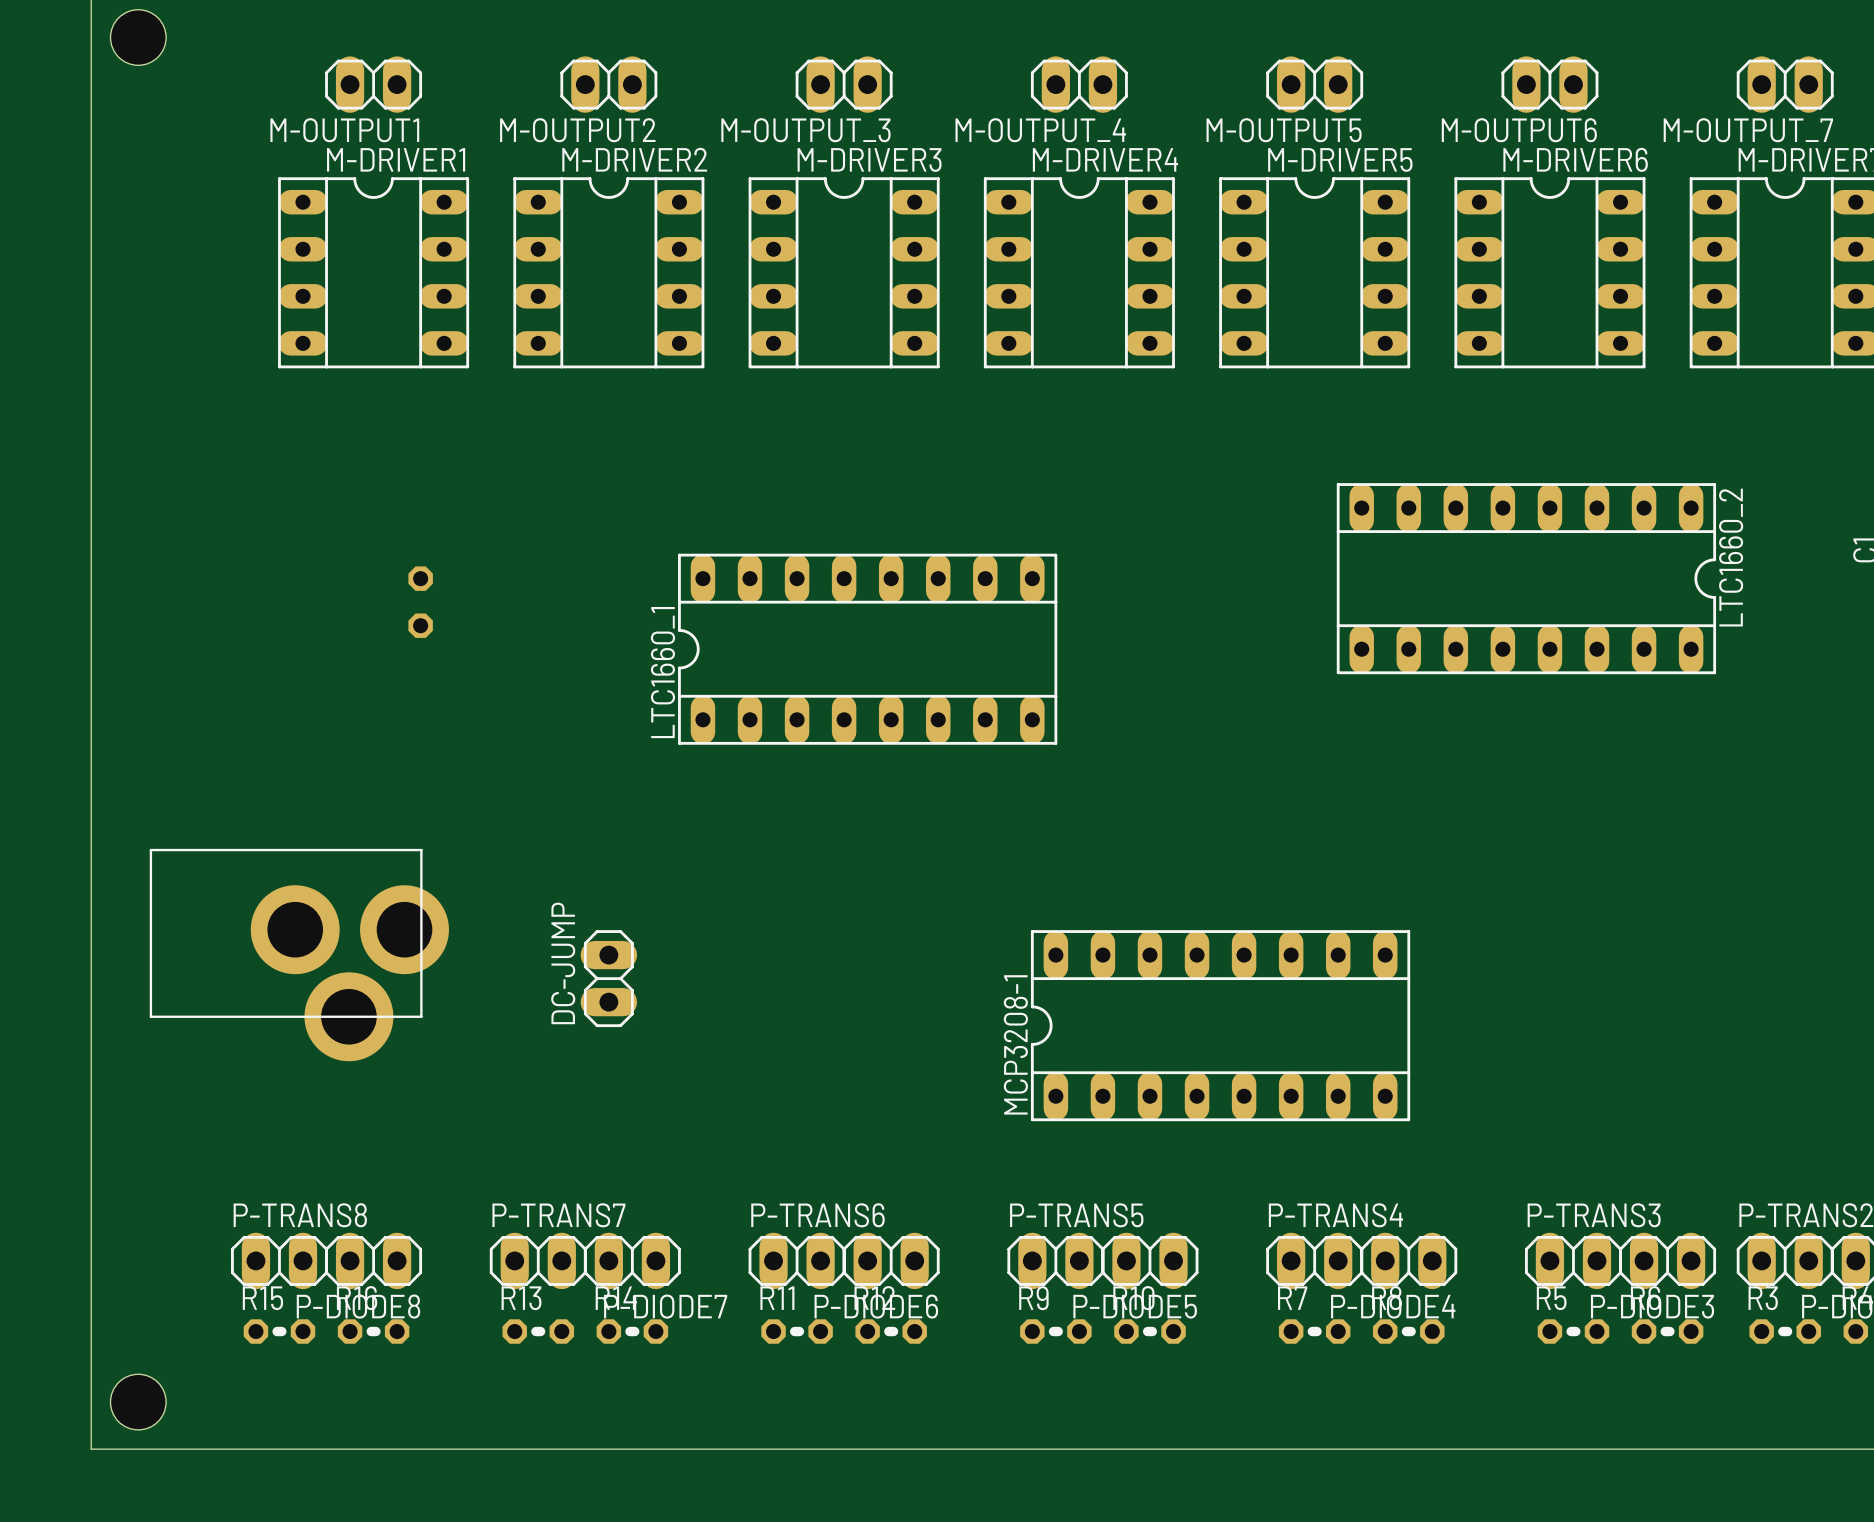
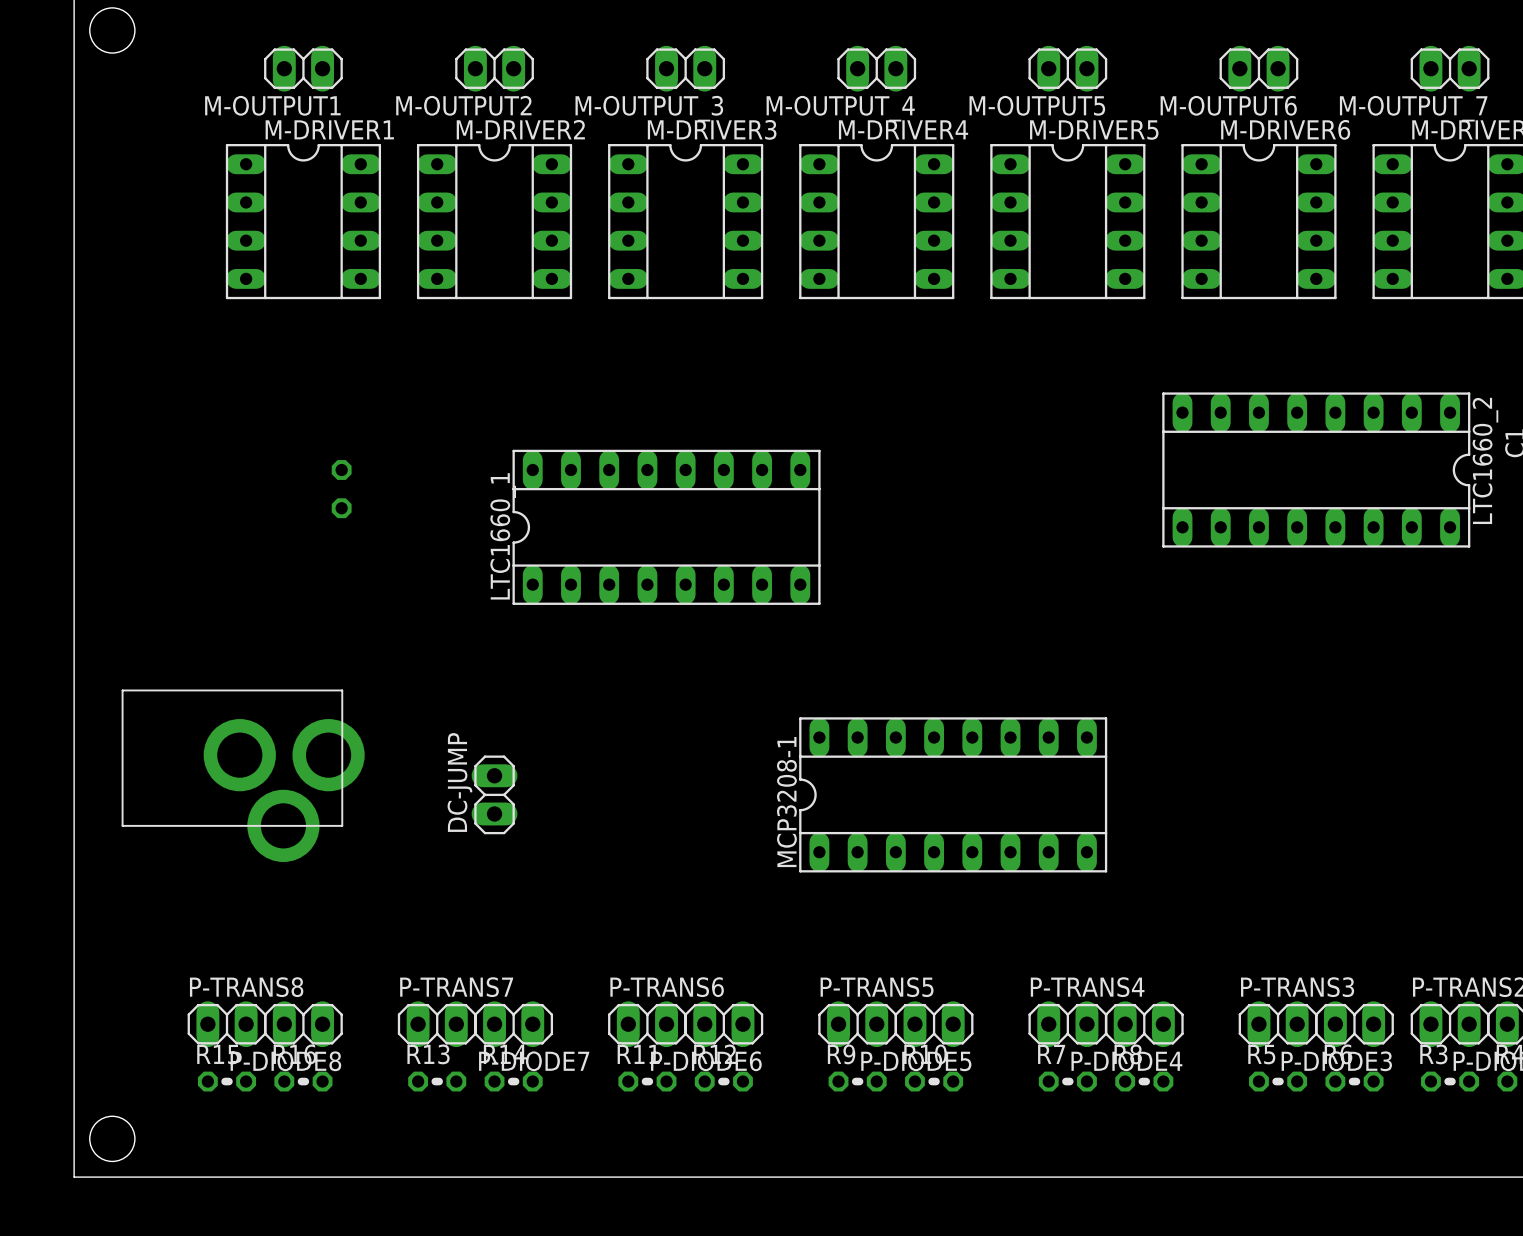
LTC1660_2 position: (1526, 578) -> (1316, 470)
LTC1660_1 position: (867, 649) -> (666, 527)
MCP3208‐1 position: (1220, 1025) -> (953, 794)

